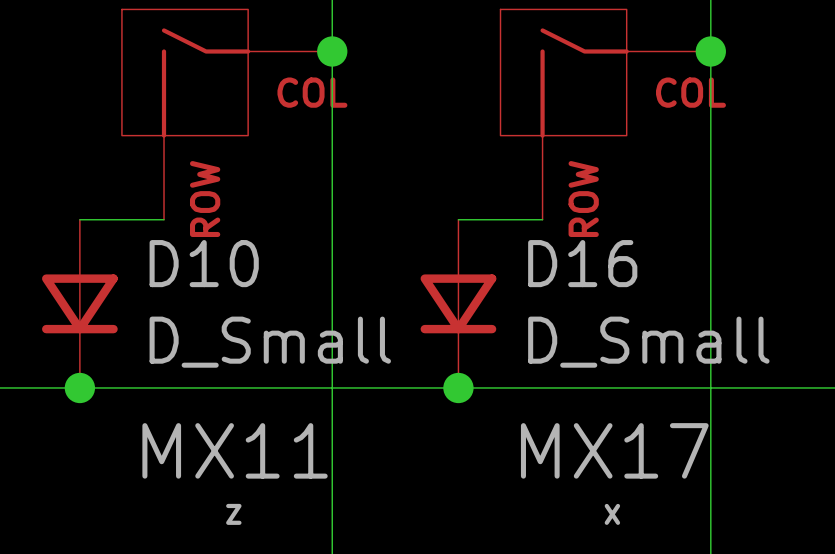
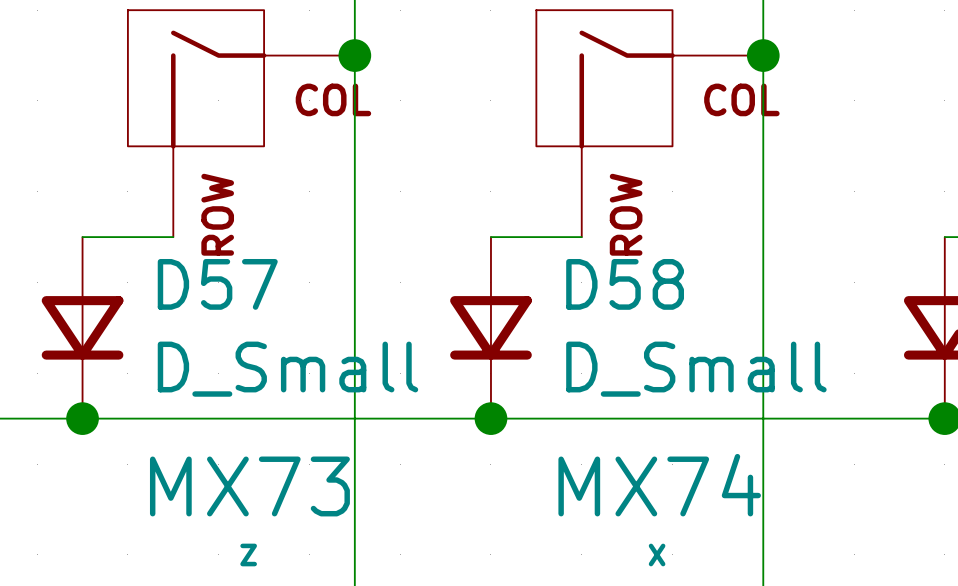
D10 name: D10 (204, 263) -> D57 (217, 284)
D16 name: D16 (582, 263) -> D58 (625, 284)
MX11 name: MX11 (235, 450) -> MX73 (249, 486)
MX17 name: MX17 (614, 450) -> MX74 (659, 485)

